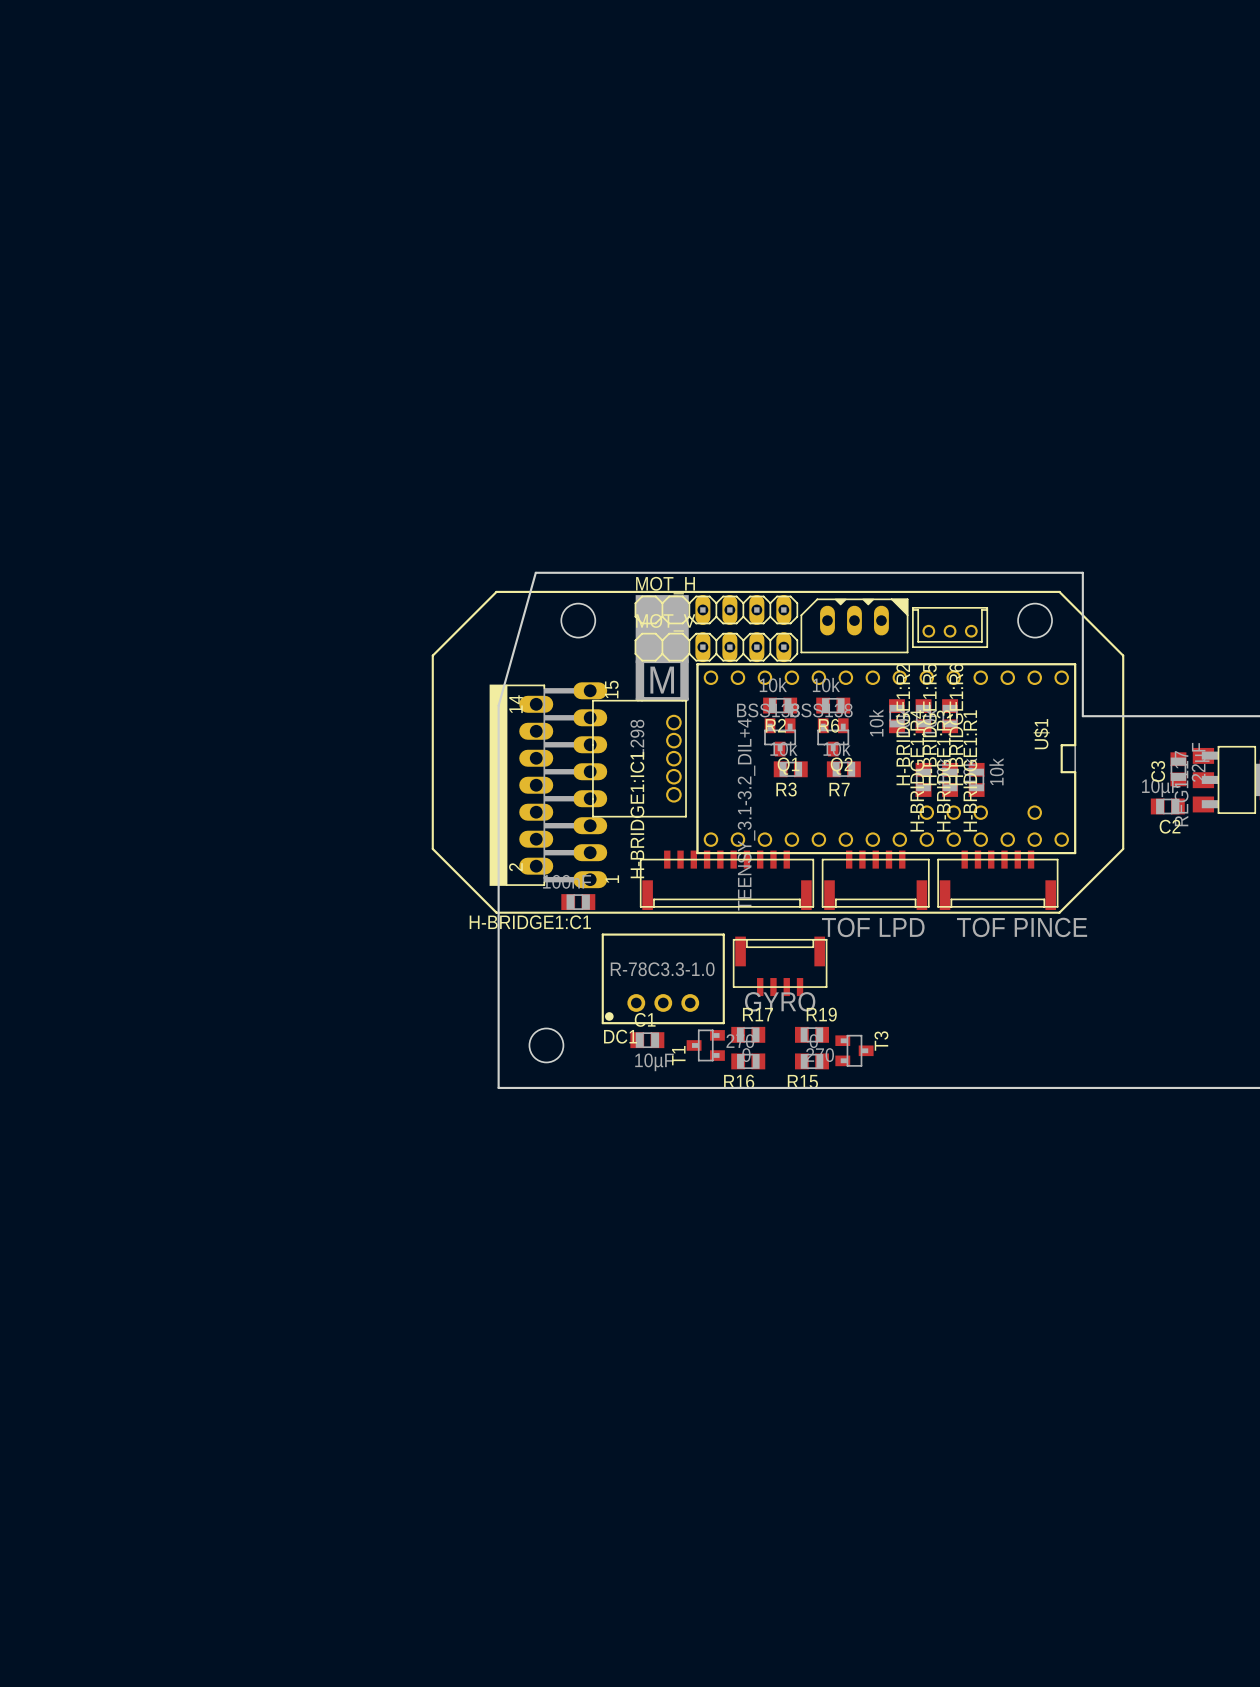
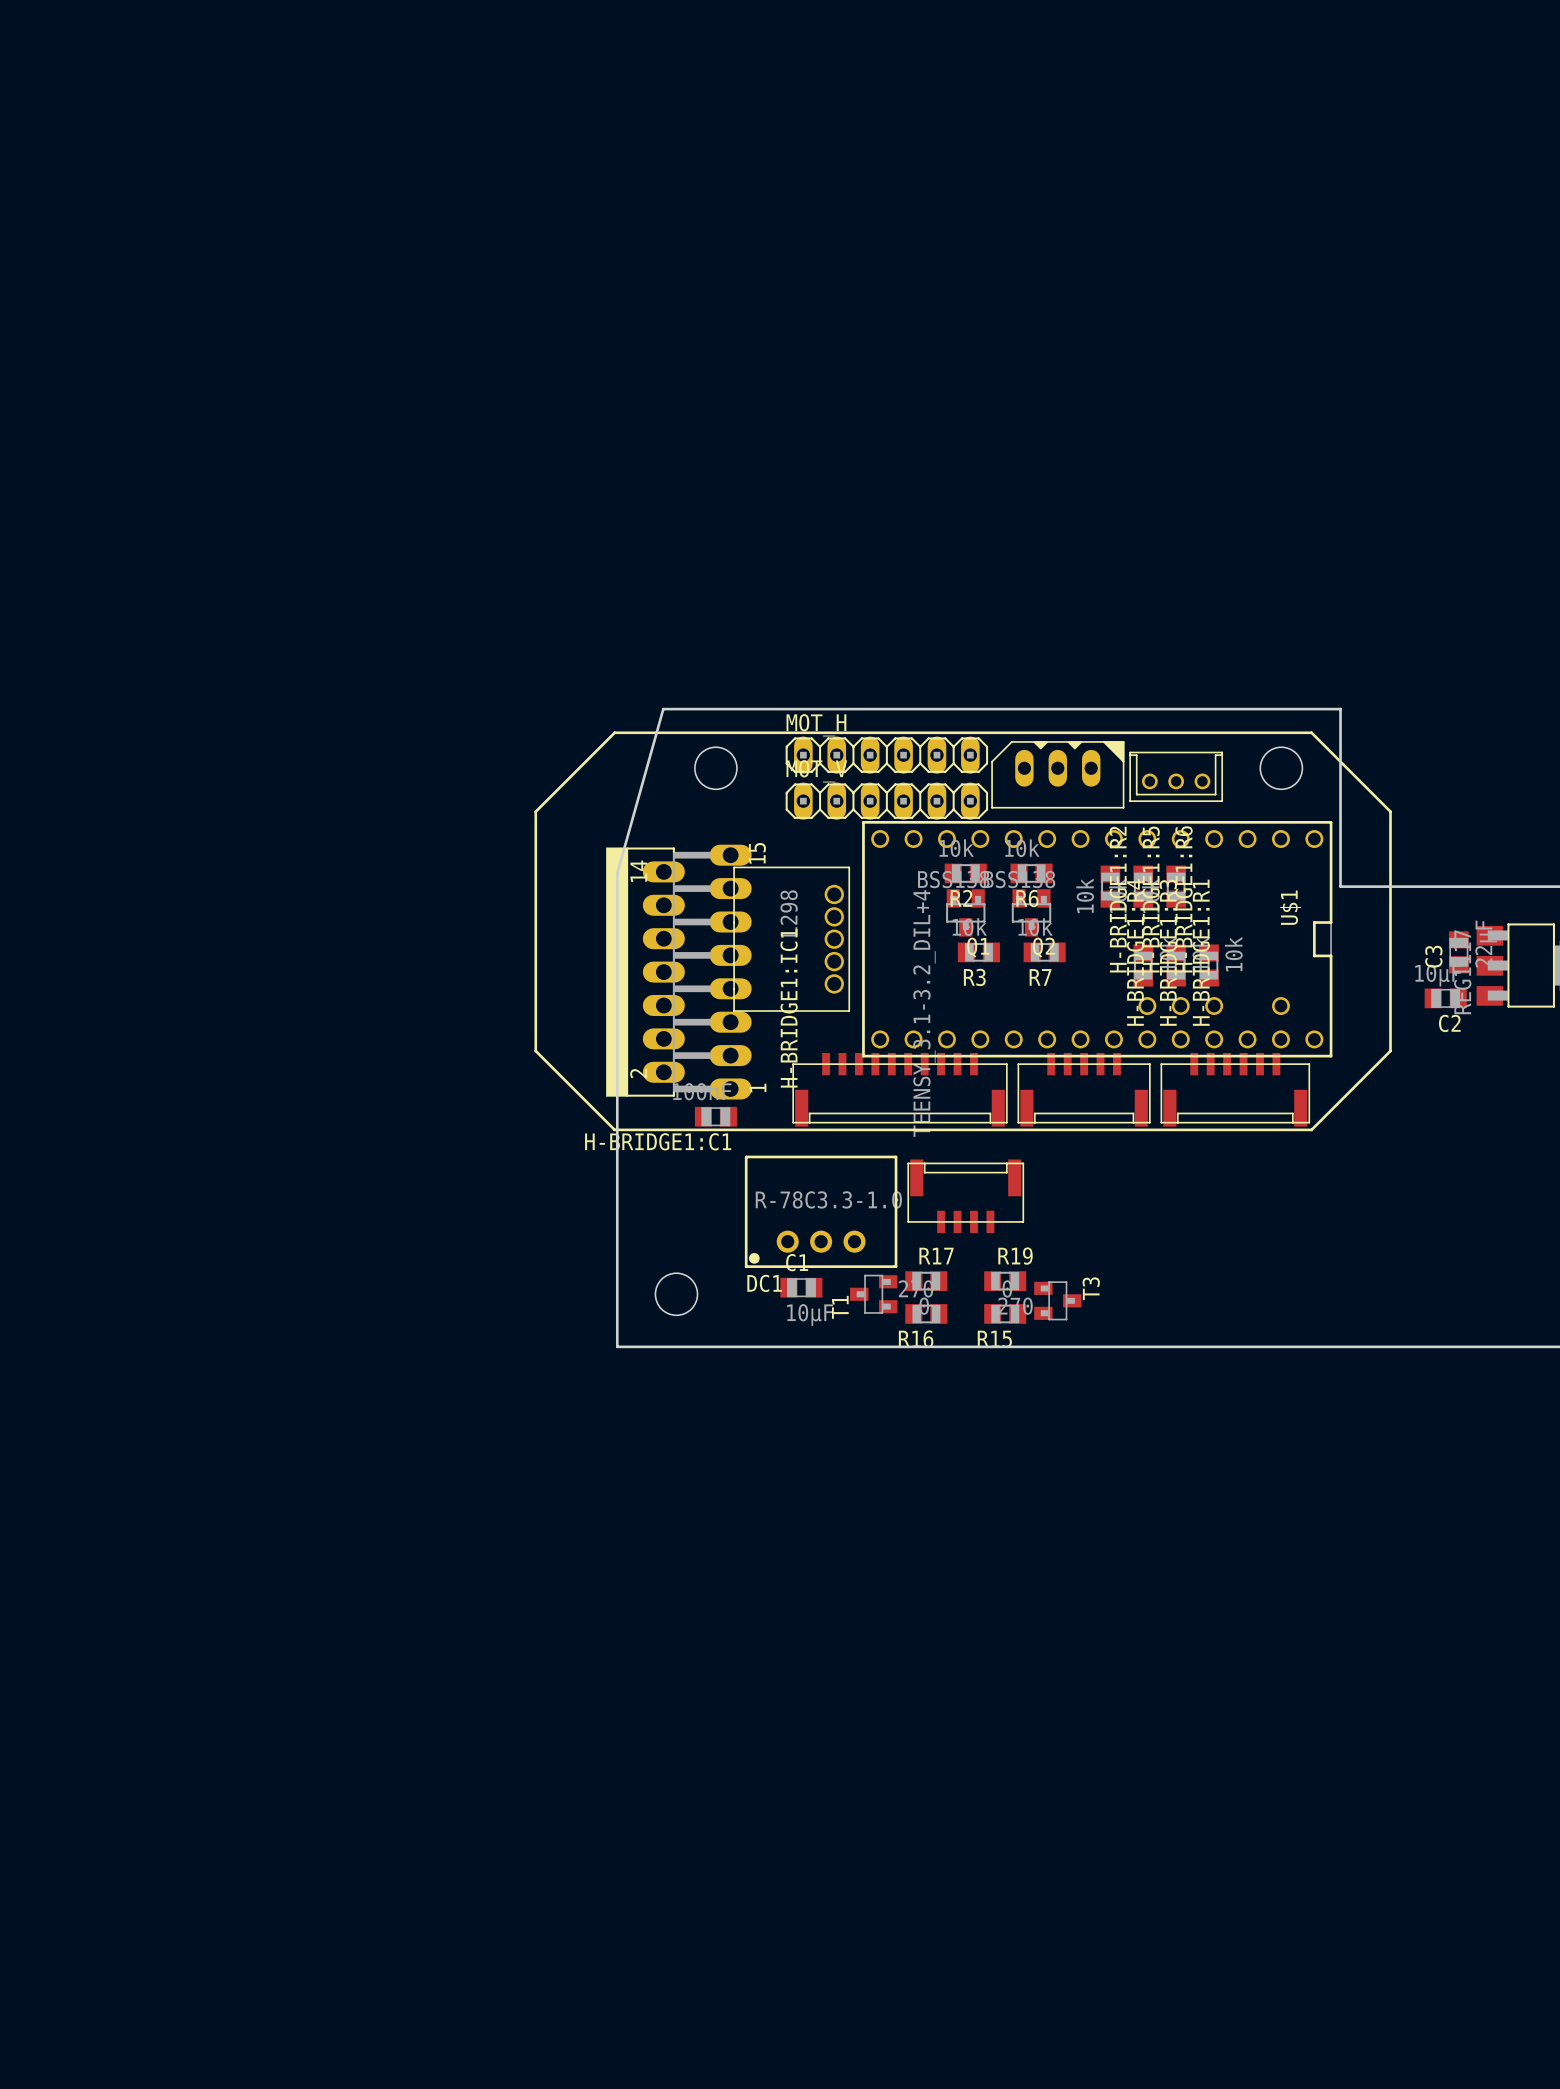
drawing: [635, 595, 689, 664] -> none
line: (637, 660) (637, 699) (686, 699) (686, 660) -> none
line: (642, 660) (642, 699) -> none
line: (682, 660) (682, 699) -> none
text: M (662, 680) -> none
text: TOF LPD (873, 927) -> none
text: TOF PINCE (1022, 927) -> none
text: GYRO (780, 1001) -> none

